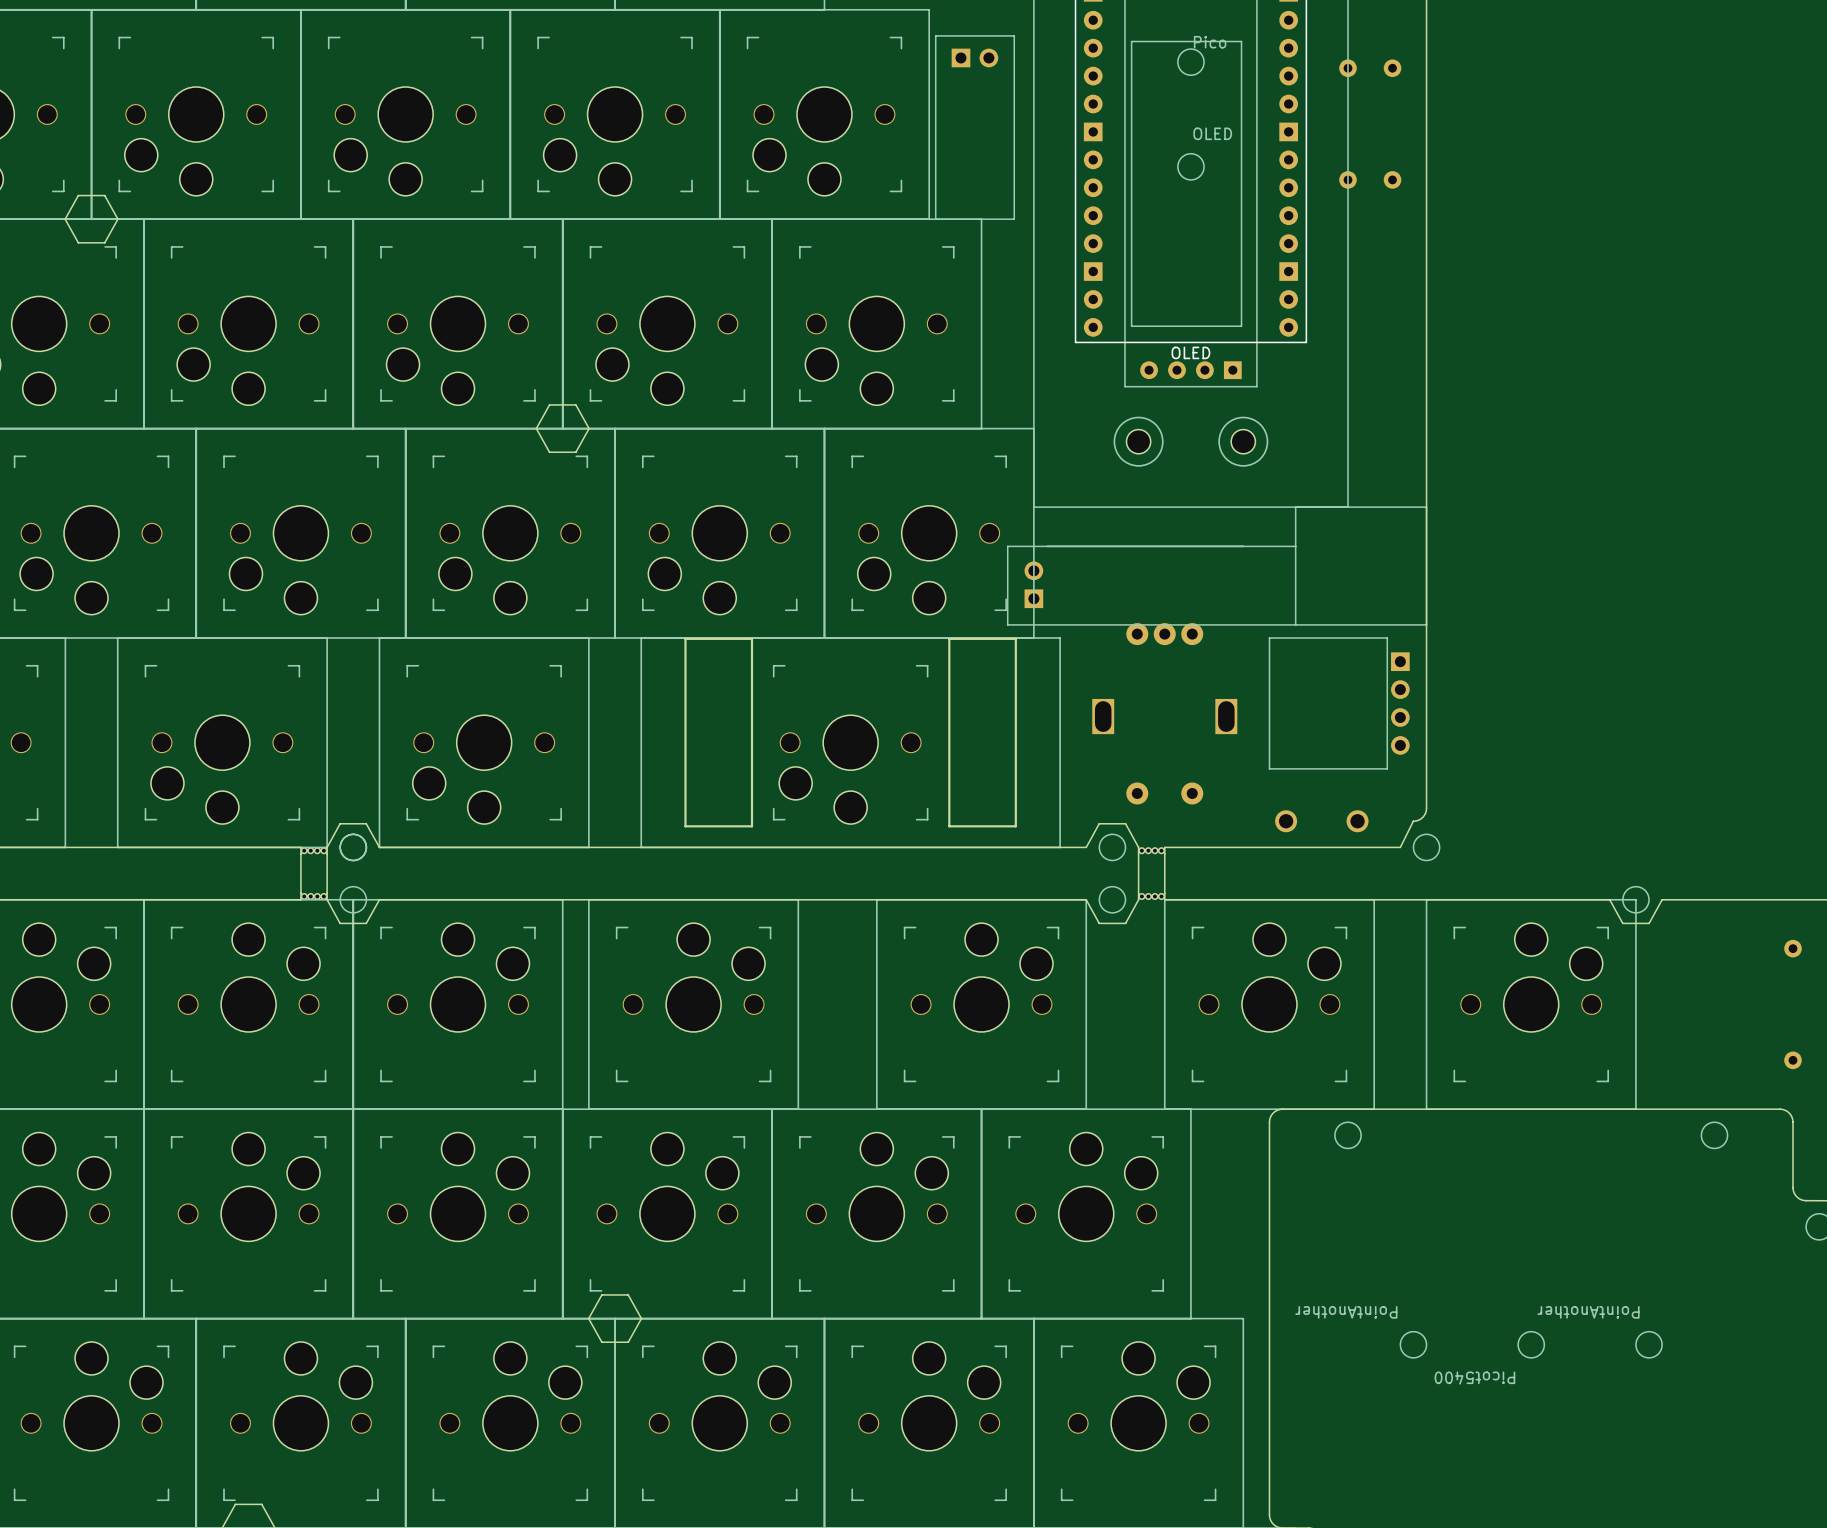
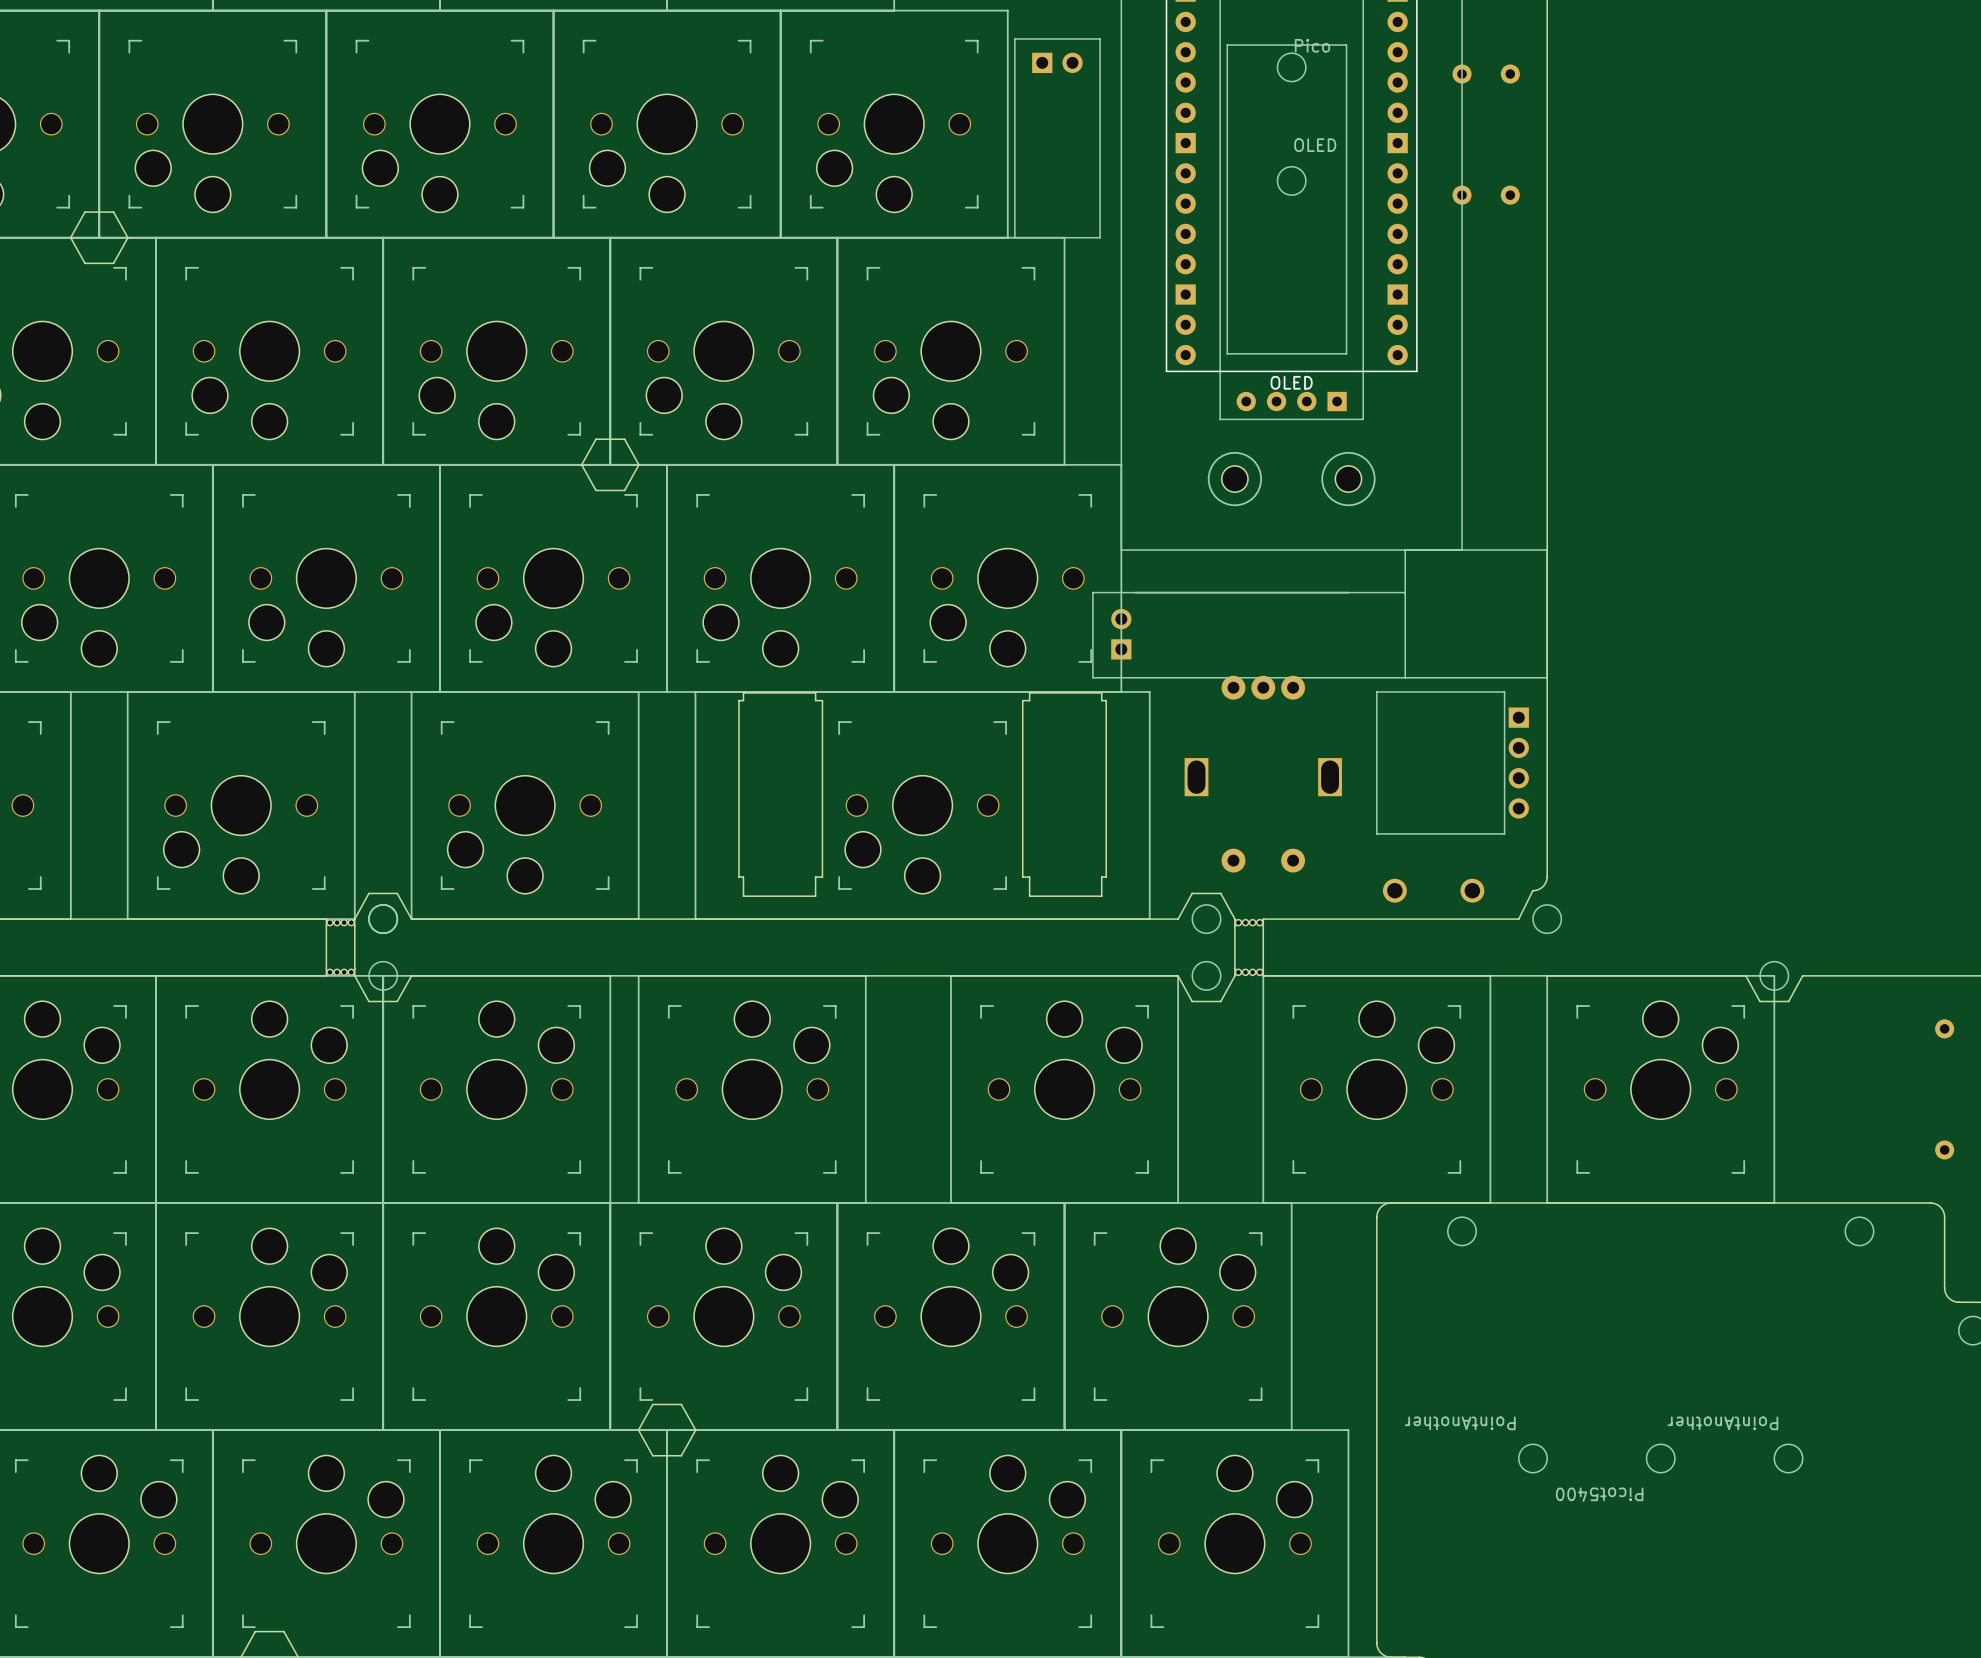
part footprint: [640, 637, 1061, 849] -> [694, 691, 1151, 920]

